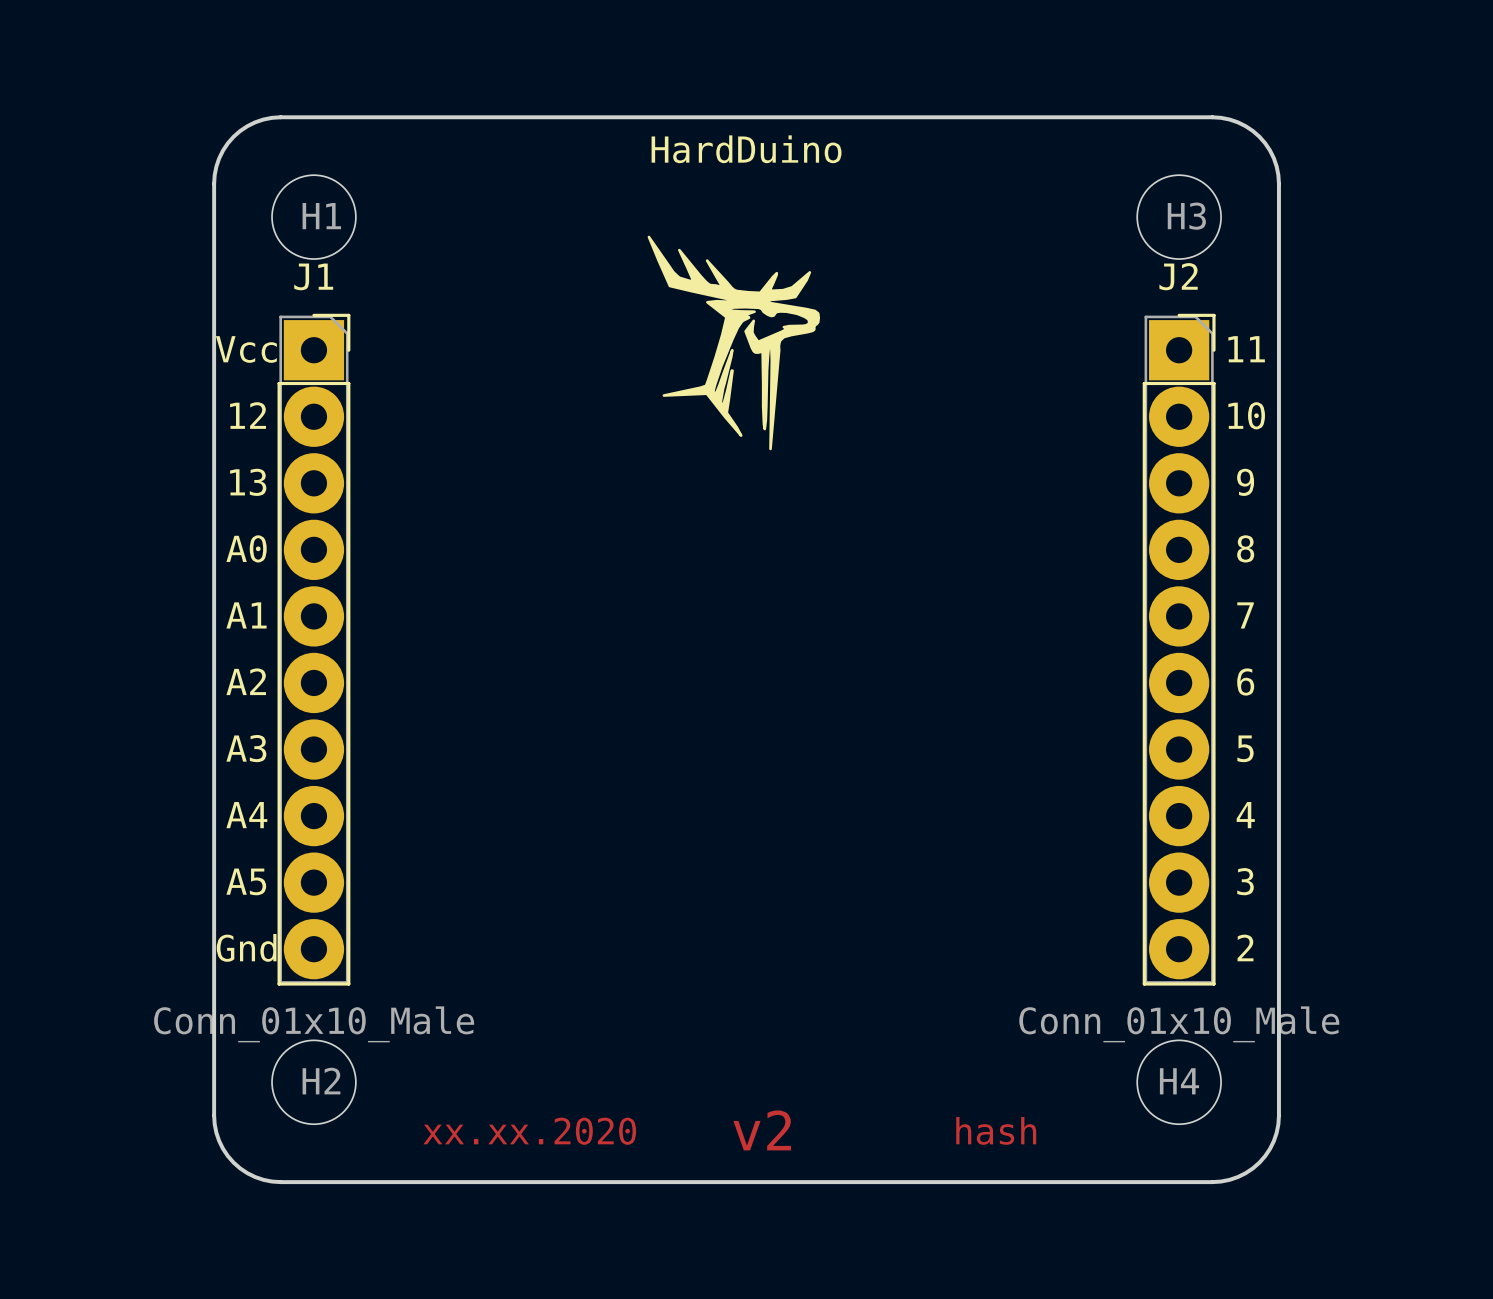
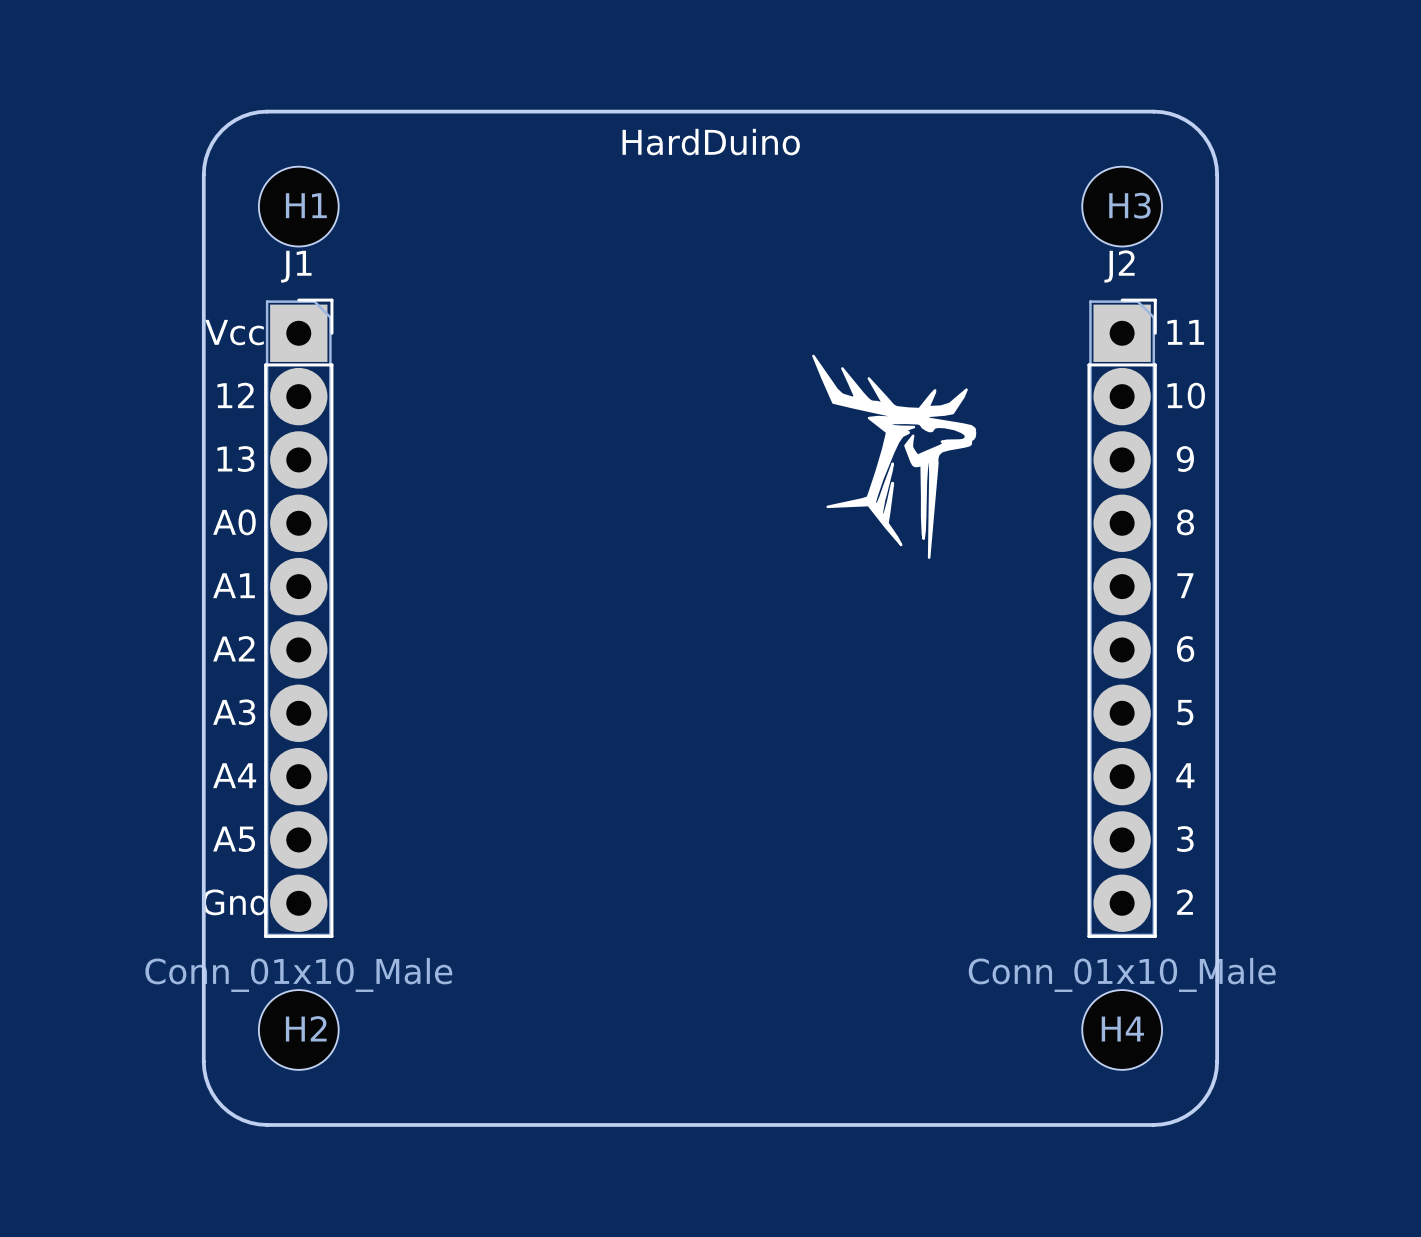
drawing position: (733, 343) -> (894, 456)
text: v2 (762, 1130) -> none
text: hash (996, 1130) -> none
text: xx.xx.2020 (529, 1131) -> none

